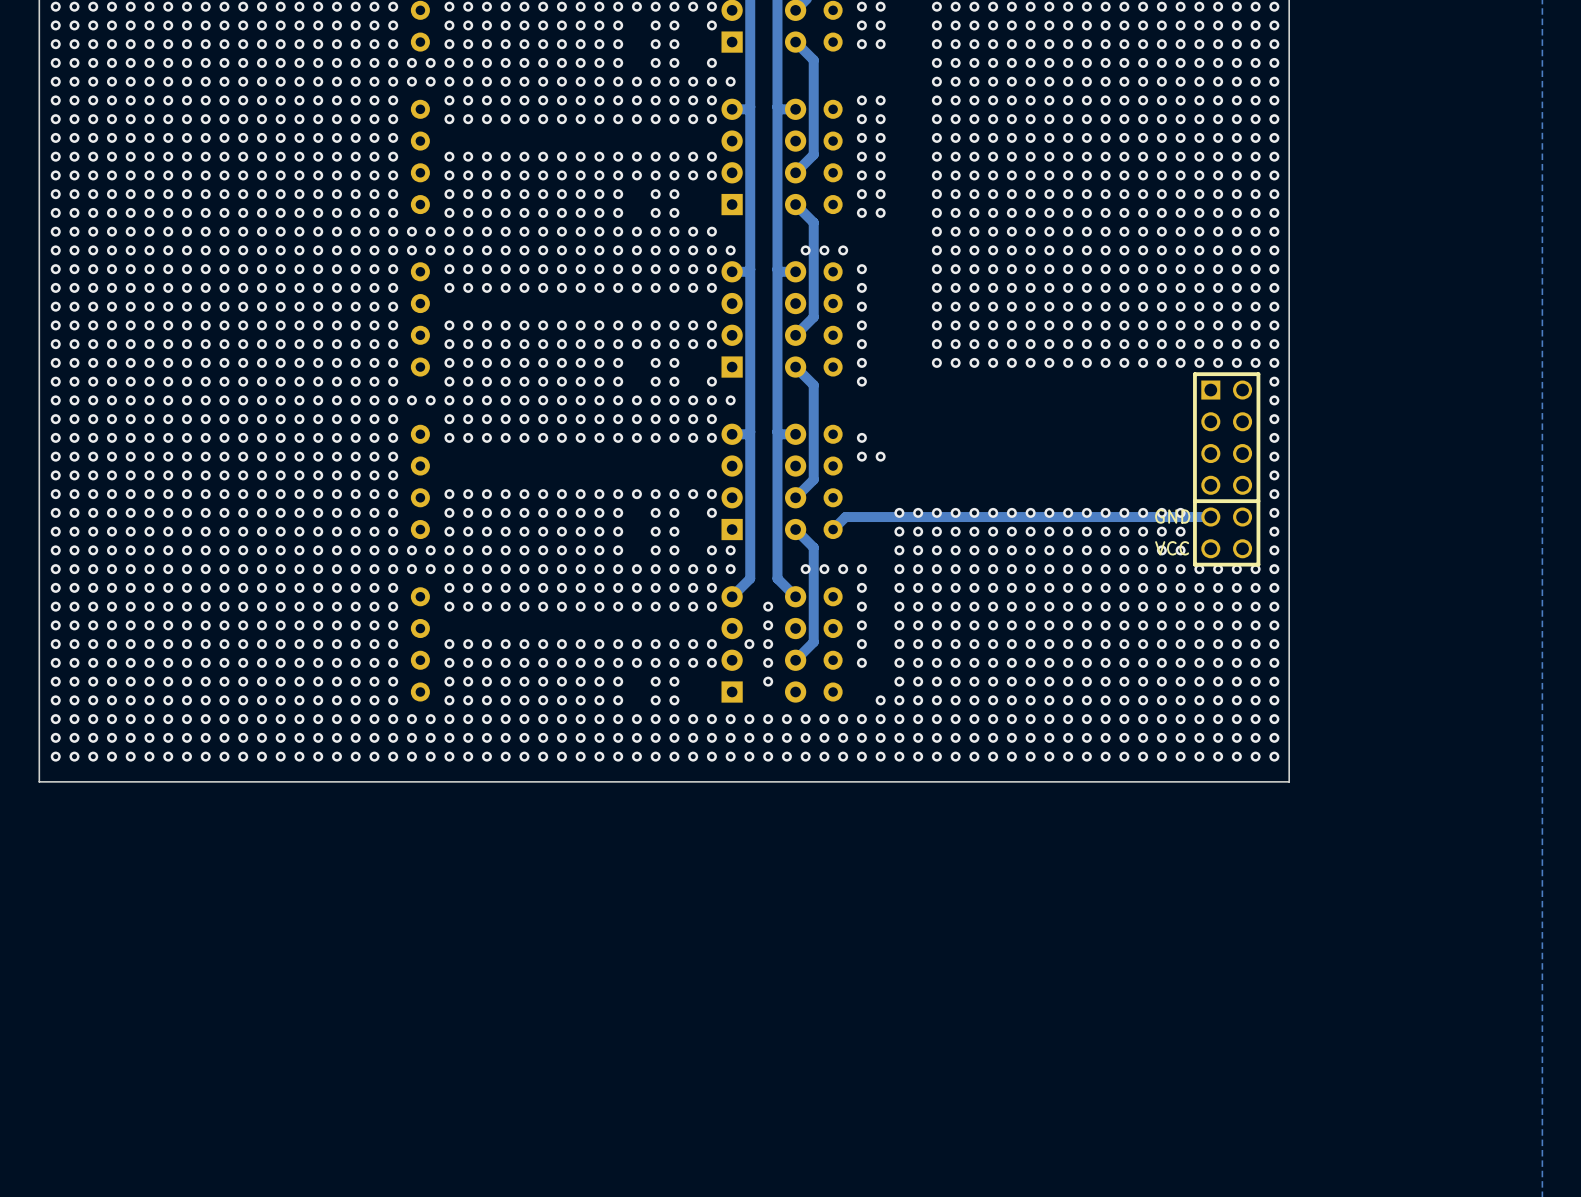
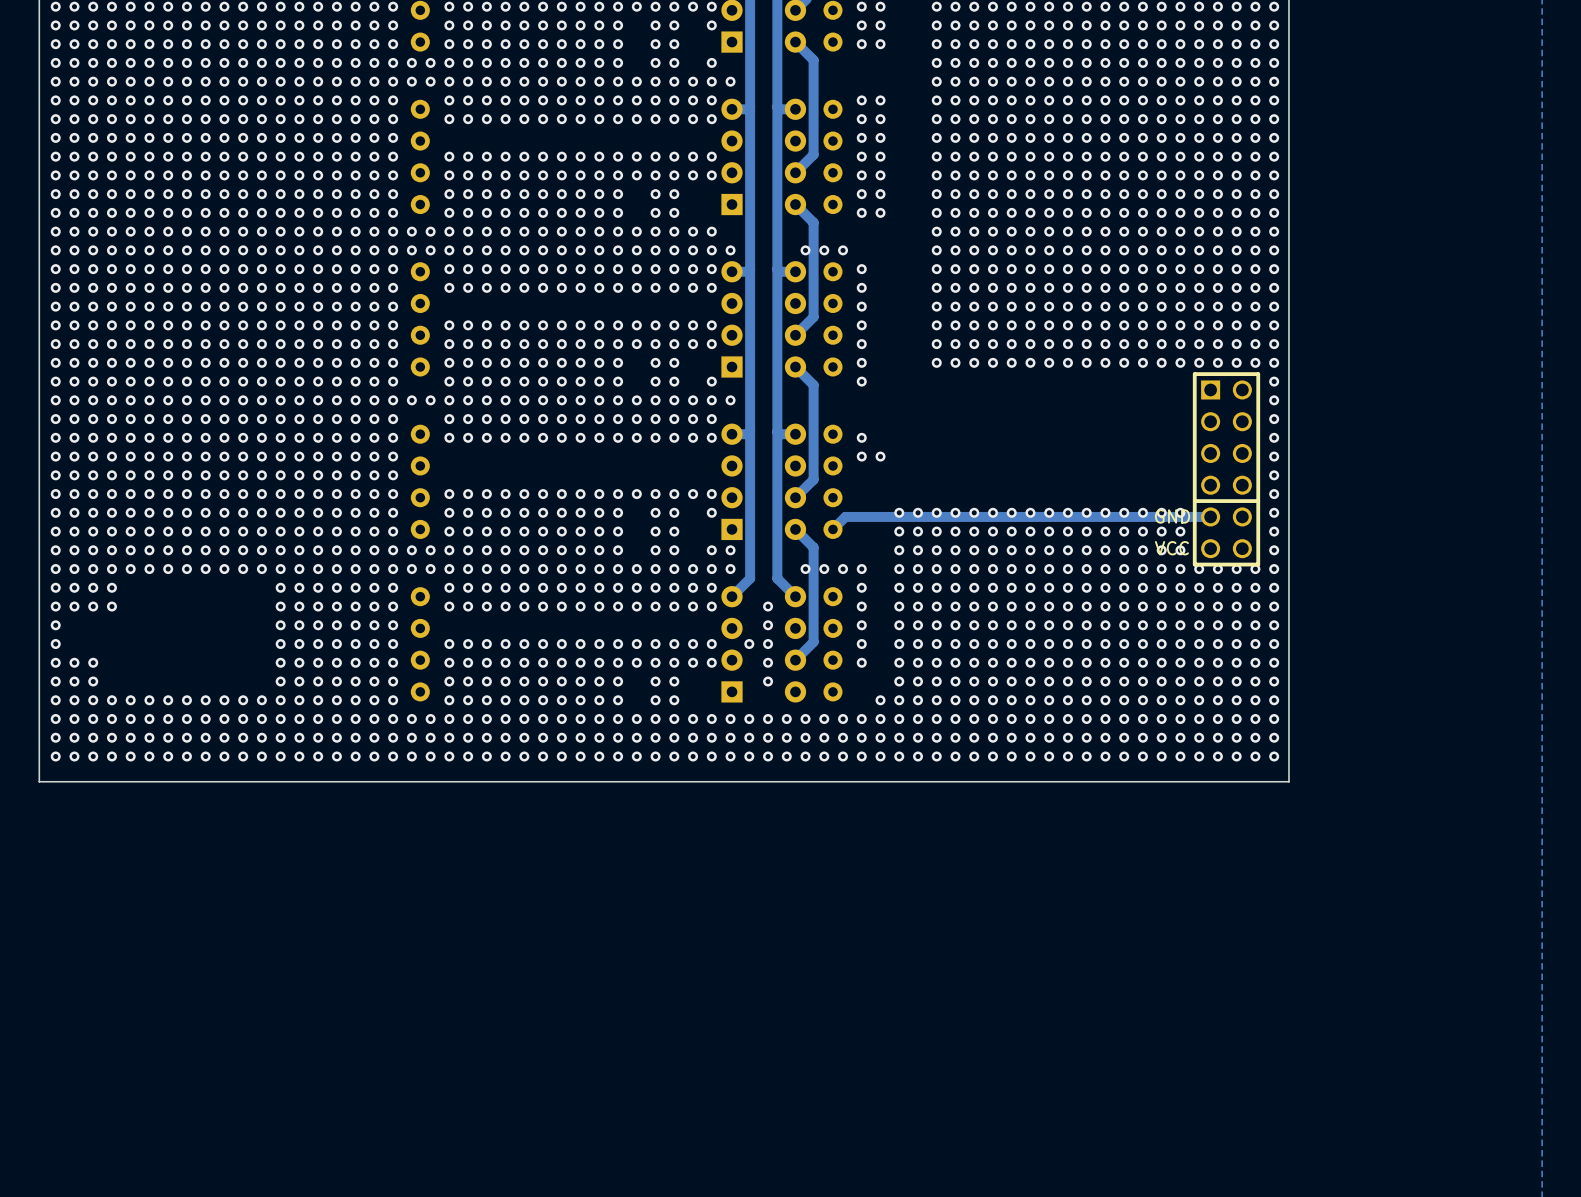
via: (130, 587) -> none
via: (149, 587) -> none
via: (168, 587) -> none
via: (186, 587) -> none
via: (205, 587) -> none
via: (224, 587) -> none
via: (243, 587) -> none
via: (261, 587) -> none
via: (130, 606) -> none
via: (149, 606) -> none
via: (168, 606) -> none
via: (186, 606) -> none
via: (205, 606) -> none
via: (224, 606) -> none
via: (243, 606) -> none
via: (261, 606) -> none
via: (74, 625) -> none
via: (93, 625) -> none
via: (111, 625) -> none
via: (130, 625) -> none
via: (149, 625) -> none
via: (168, 625) -> none
via: (186, 625) -> none
via: (205, 625) -> none
via: (224, 625) -> none
via: (243, 625) -> none
via: (261, 625) -> none
via: (74, 644) -> none
via: (93, 644) -> none
via: (111, 644) -> none
via: (130, 644) -> none
via: (149, 644) -> none
via: (168, 644) -> none
via: (186, 644) -> none
via: (205, 644) -> none
via: (224, 644) -> none
via: (243, 644) -> none
via: (261, 644) -> none
via: (111, 662) -> none
via: (130, 662) -> none
via: (149, 662) -> none
via: (168, 662) -> none
via: (186, 662) -> none
via: (205, 662) -> none
via: (224, 662) -> none
via: (243, 662) -> none
via: (261, 662) -> none
via: (111, 681) -> none
via: (130, 681) -> none
via: (149, 681) -> none
via: (168, 681) -> none
via: (186, 681) -> none
via: (205, 681) -> none
via: (224, 681) -> none
via: (243, 681) -> none
via: (261, 681) -> none

